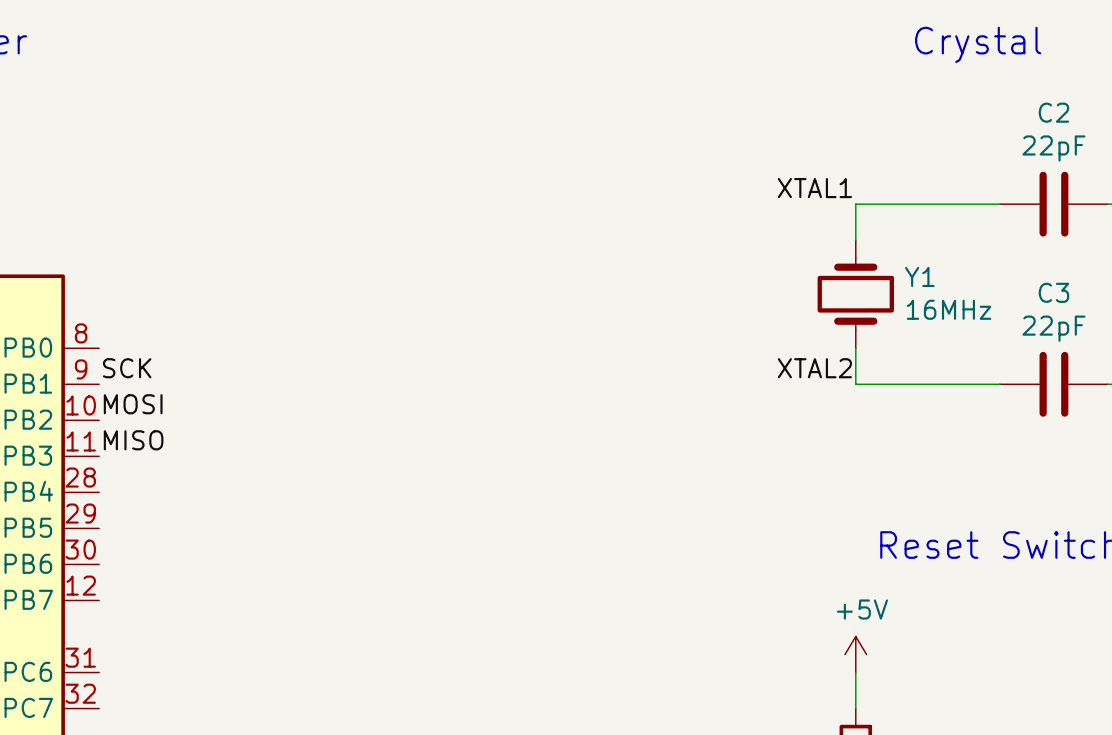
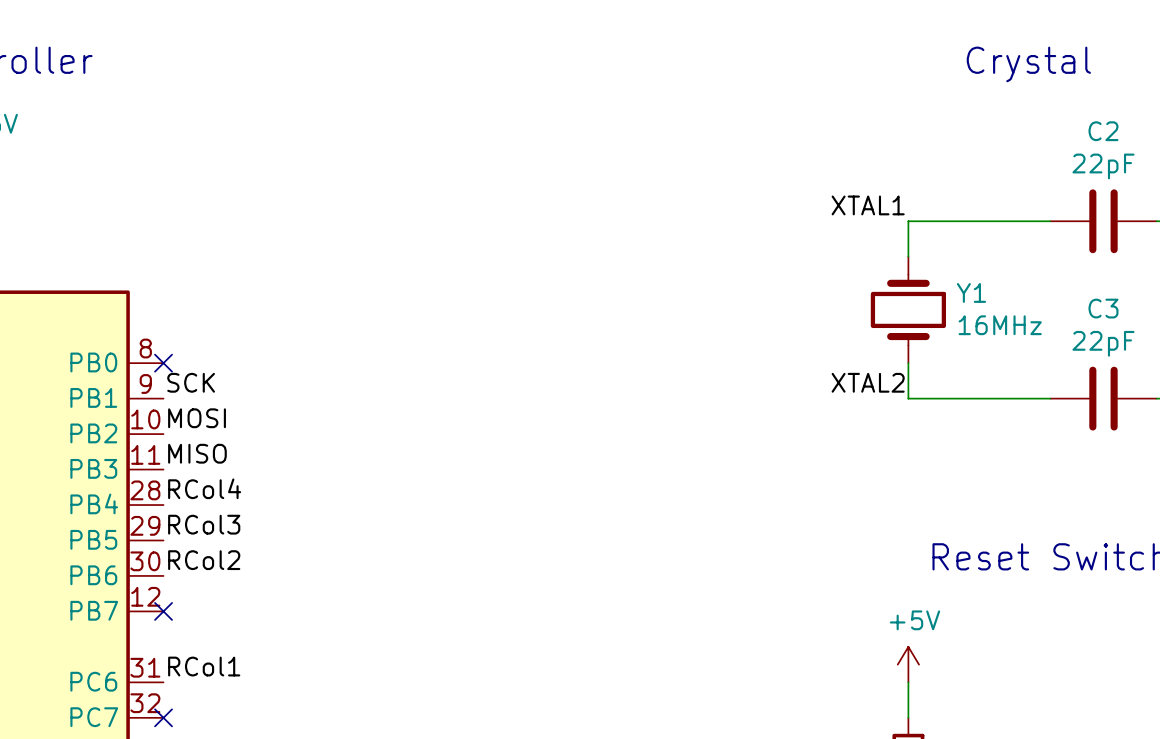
no-connect mark: none -> (163, 363)
label: none -> RCol4 (204, 488)
label: none -> RCol3 (204, 524)
label: none -> RCol2 (204, 560)
no-connect mark: none -> (163, 611)
label: none -> RCol1 (204, 666)
no-connect mark: none -> (163, 717)

